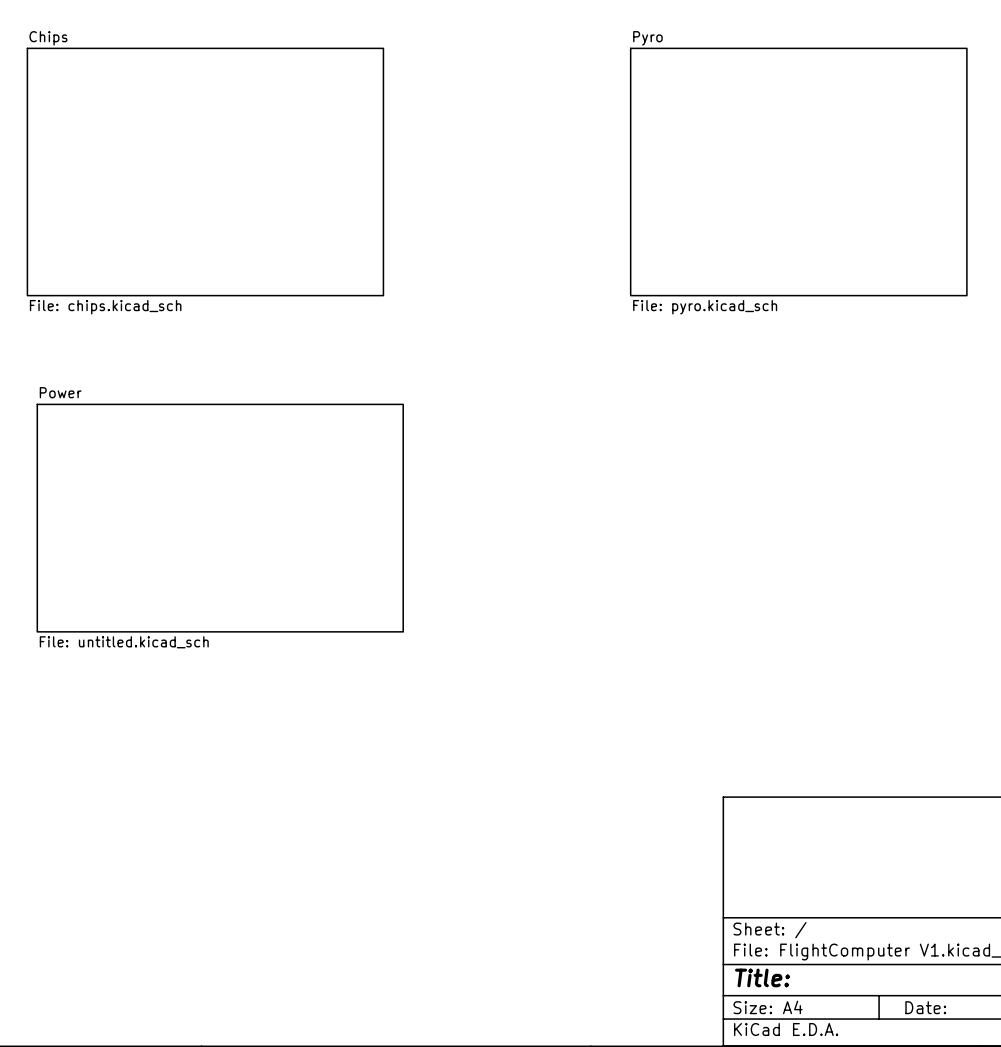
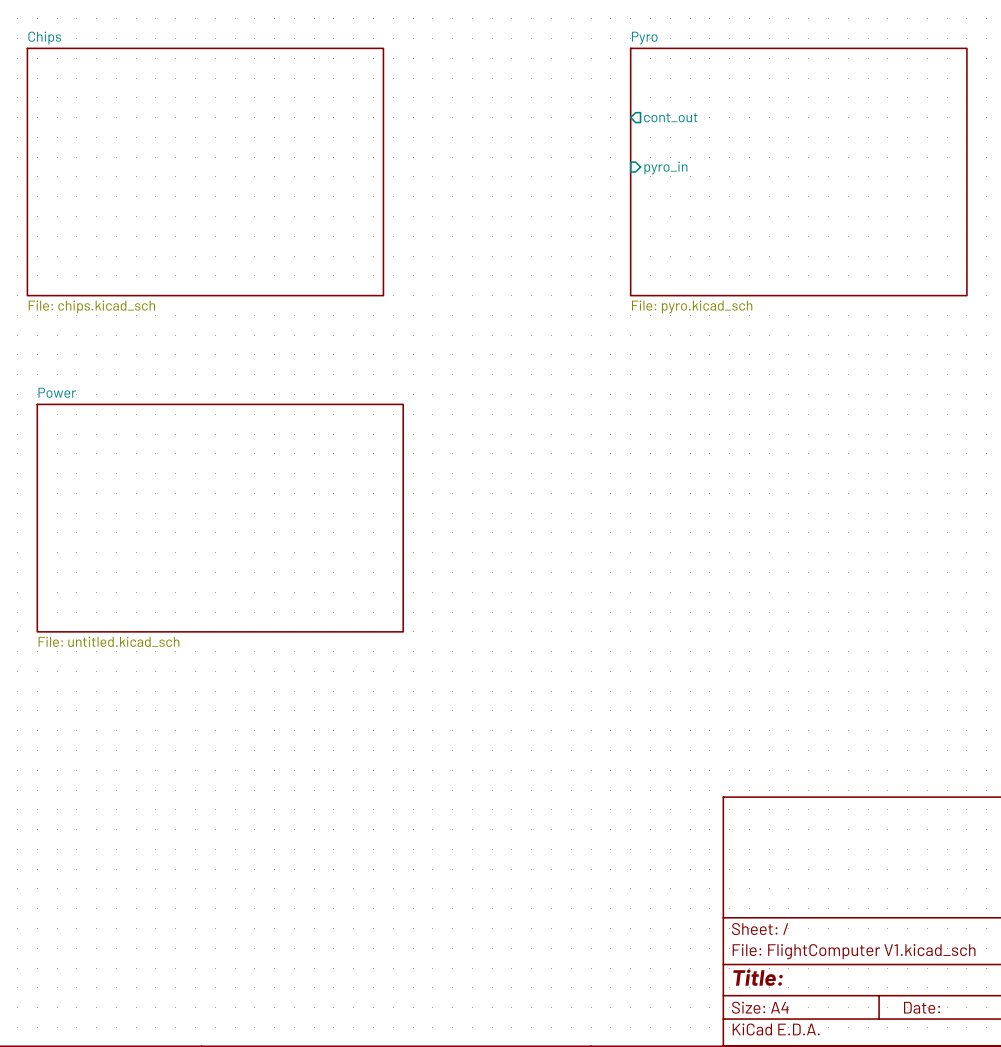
sheet pin: none -> cont_out (670, 117)
sheet pin: none -> pyro_in (665, 168)

